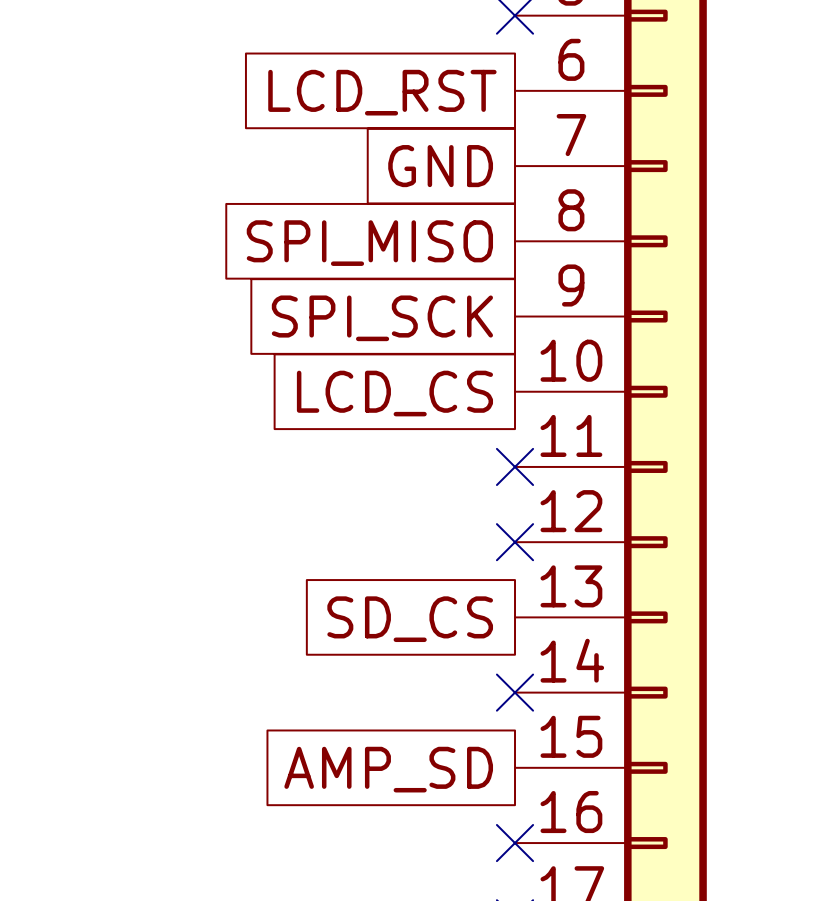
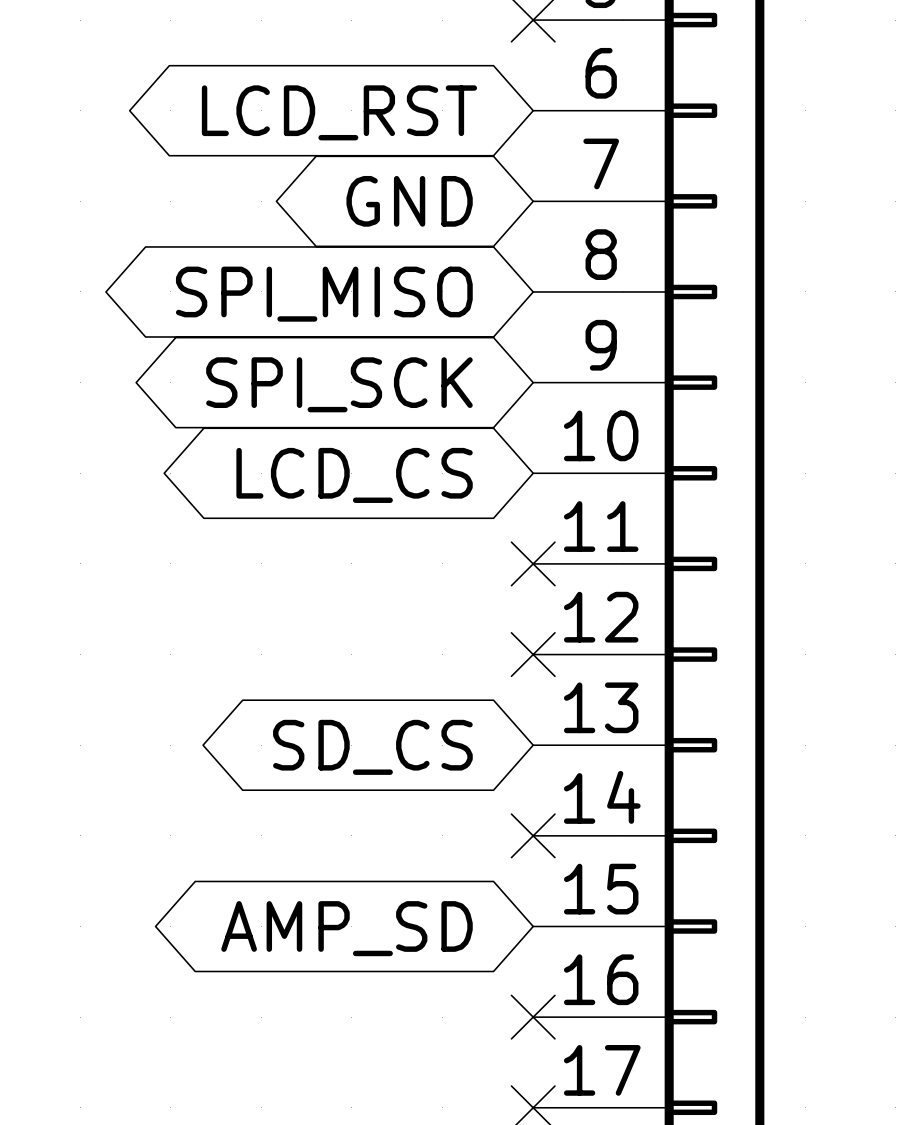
global label shape: passive (382, 92) -> bidirectional (339, 112)
global label shape: passive (440, 166) -> bidirectional (409, 201)
global label shape: passive (369, 243) -> bidirectional (324, 294)
global label shape: passive (382, 318) -> bidirectional (339, 384)
global label shape: passive (394, 393) -> bidirectional (354, 475)
global label shape: passive (410, 619) -> bidirectional (372, 747)
global label shape: passive (388, 769) -> bidirectional (347, 928)

